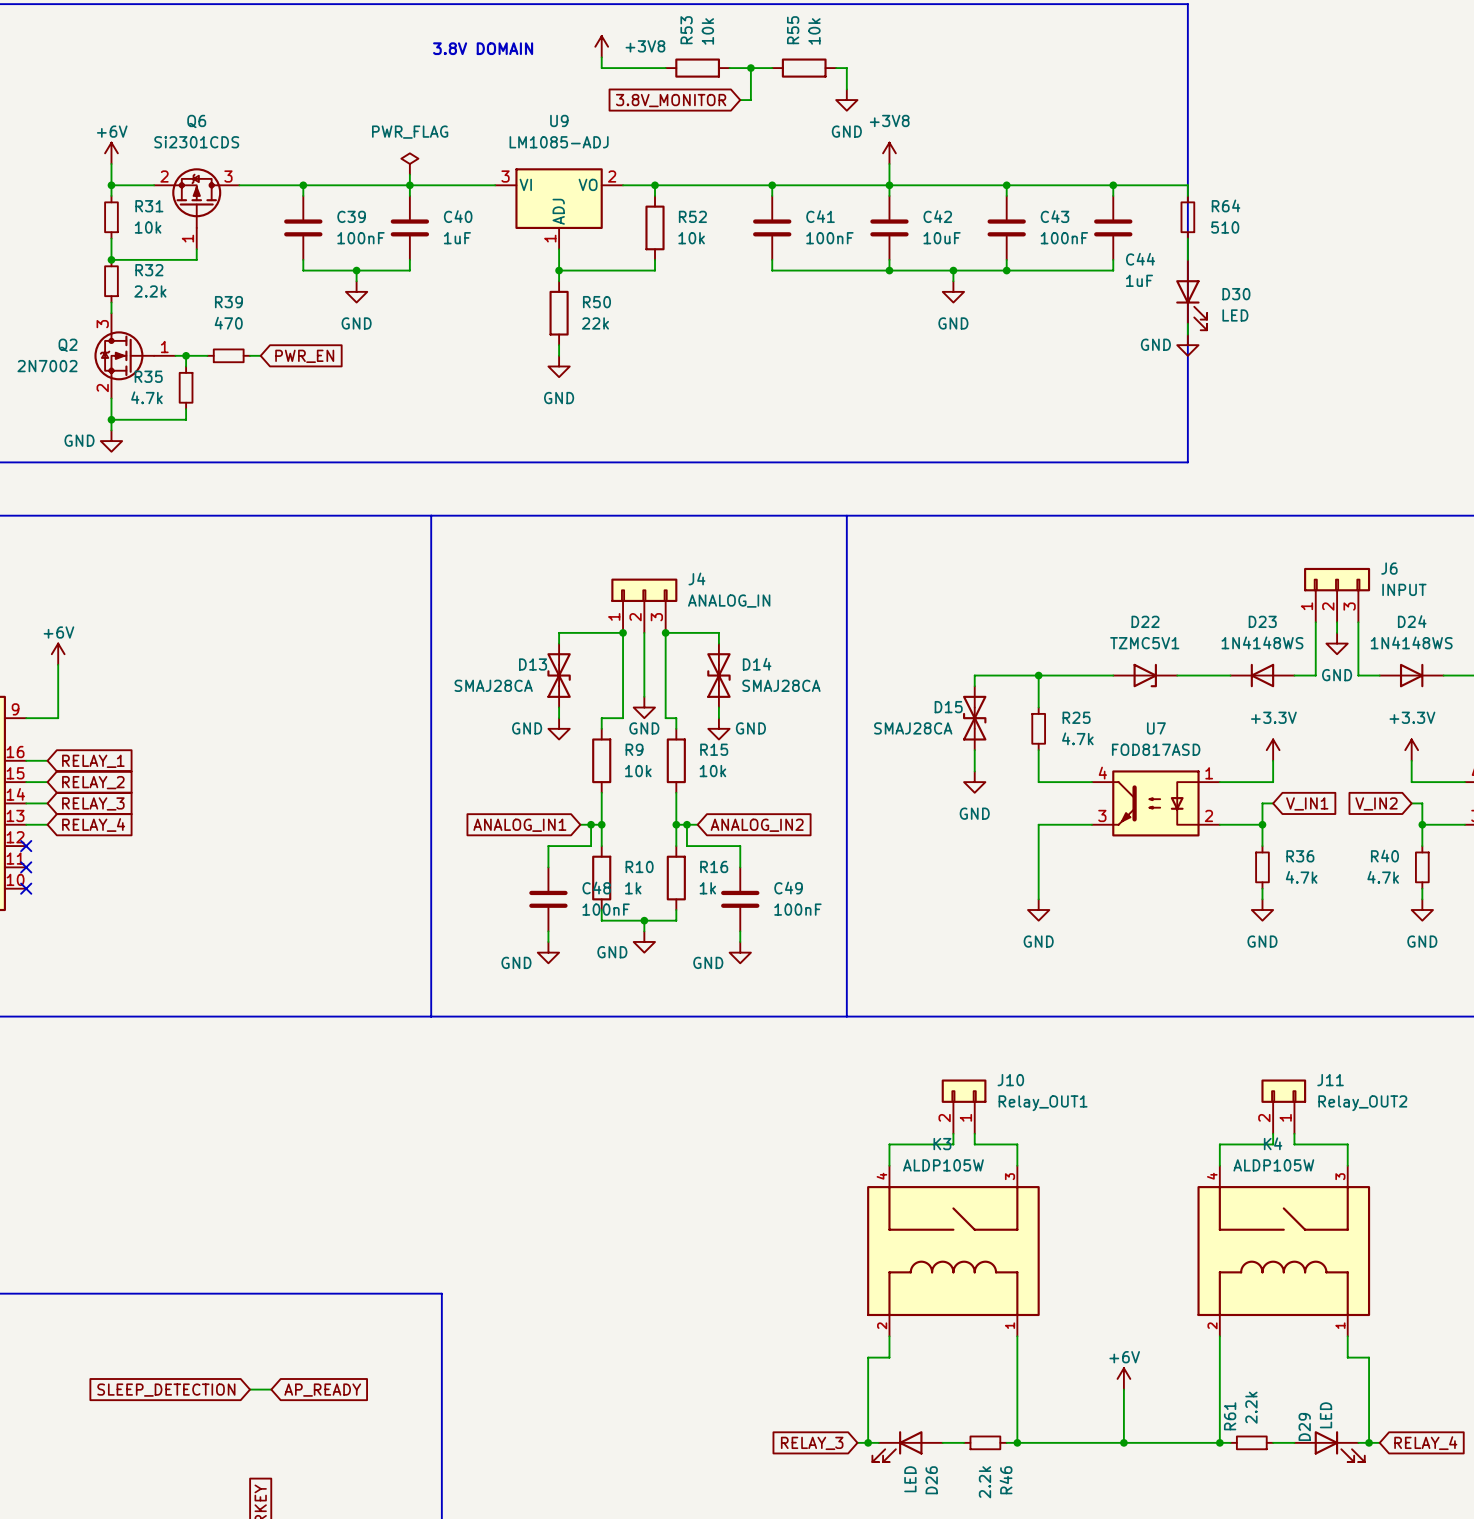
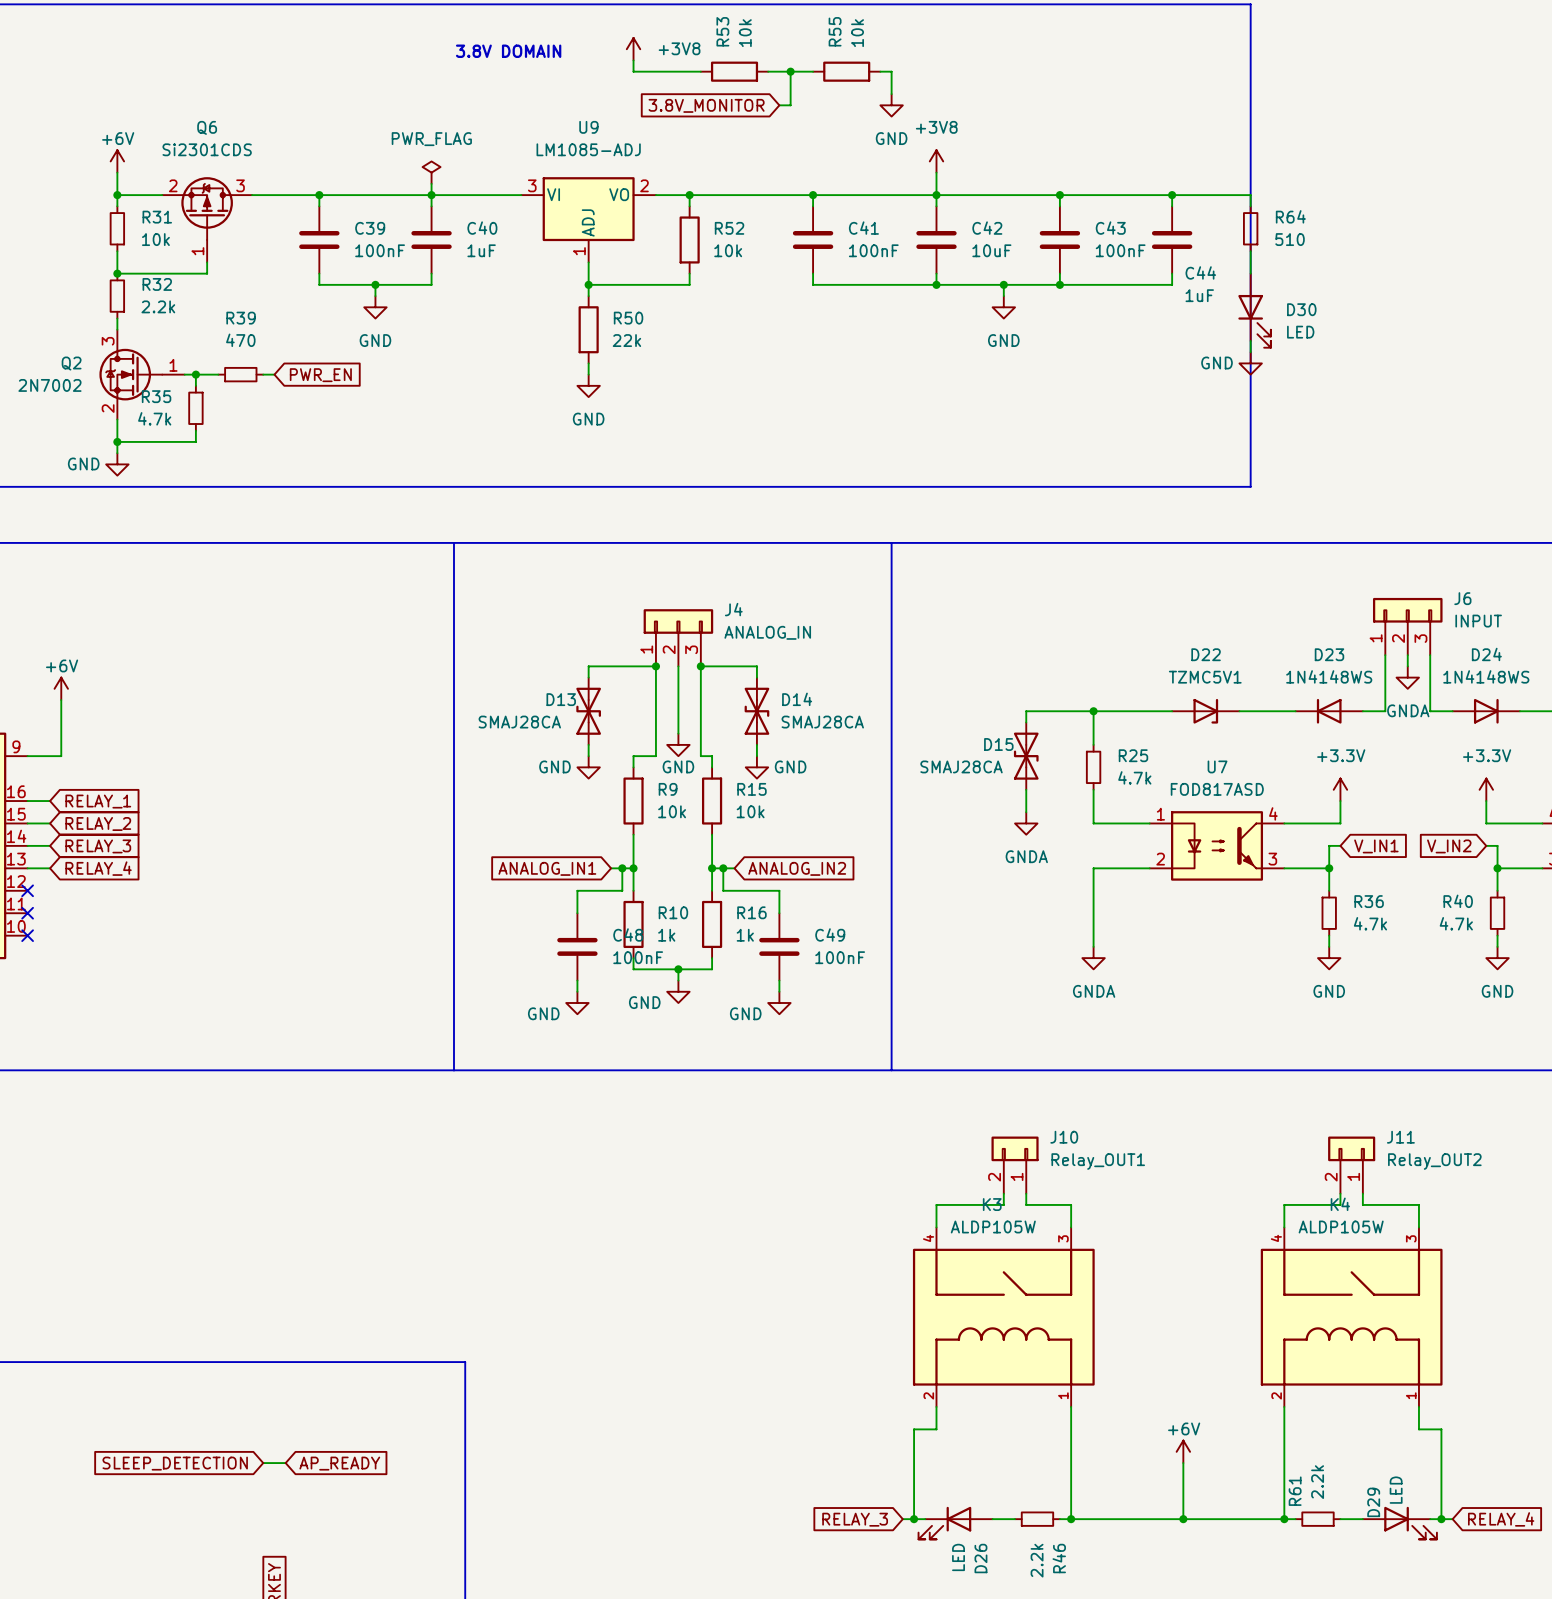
power symbol: GND (1337, 643) -> GNDA (1407, 677)
power symbol: GND (974, 782) -> GNDA (1026, 823)
U7 flip: as is (1155, 803) -> left-right (1217, 845)
power symbol: GND (1038, 910) -> GNDA (1093, 958)

